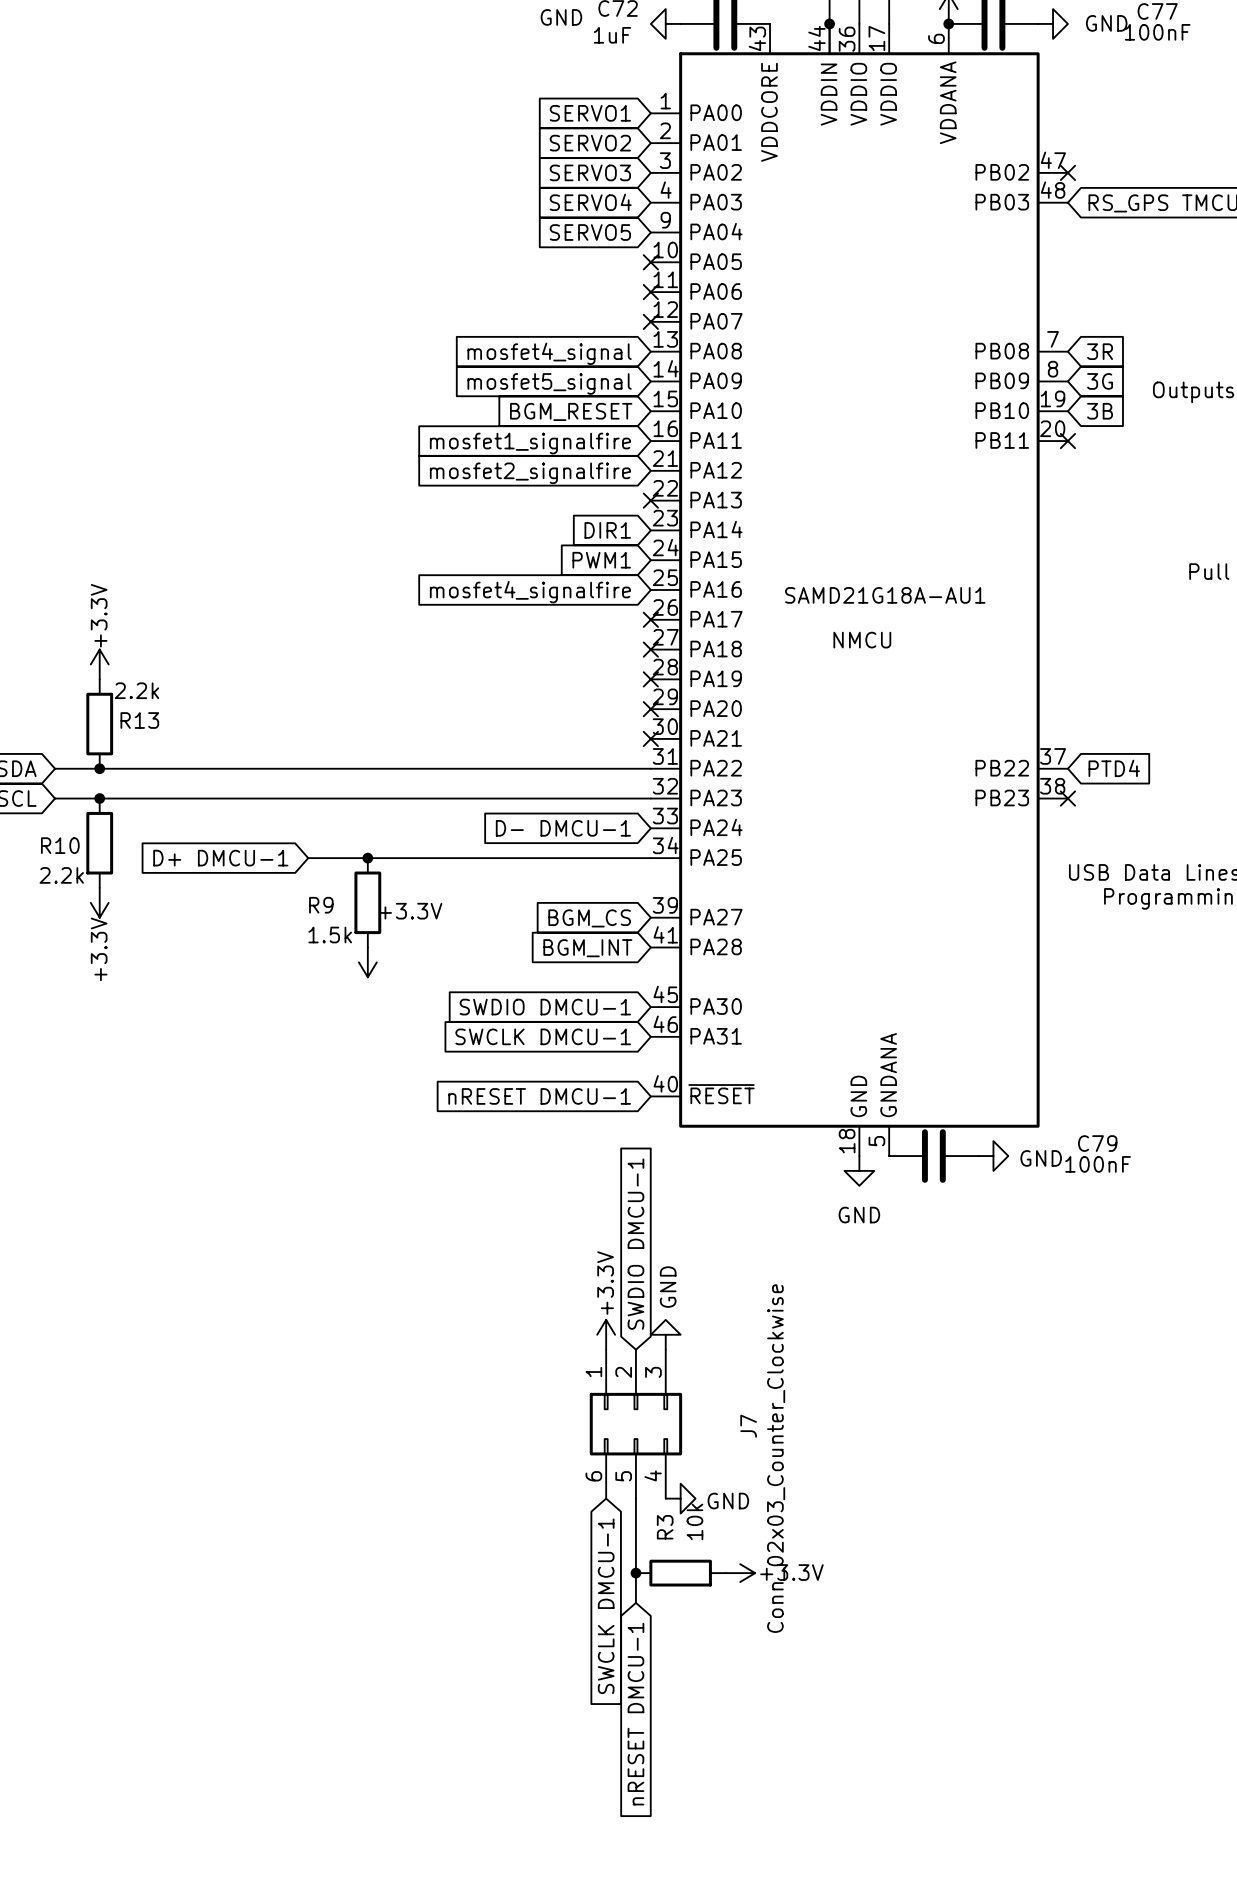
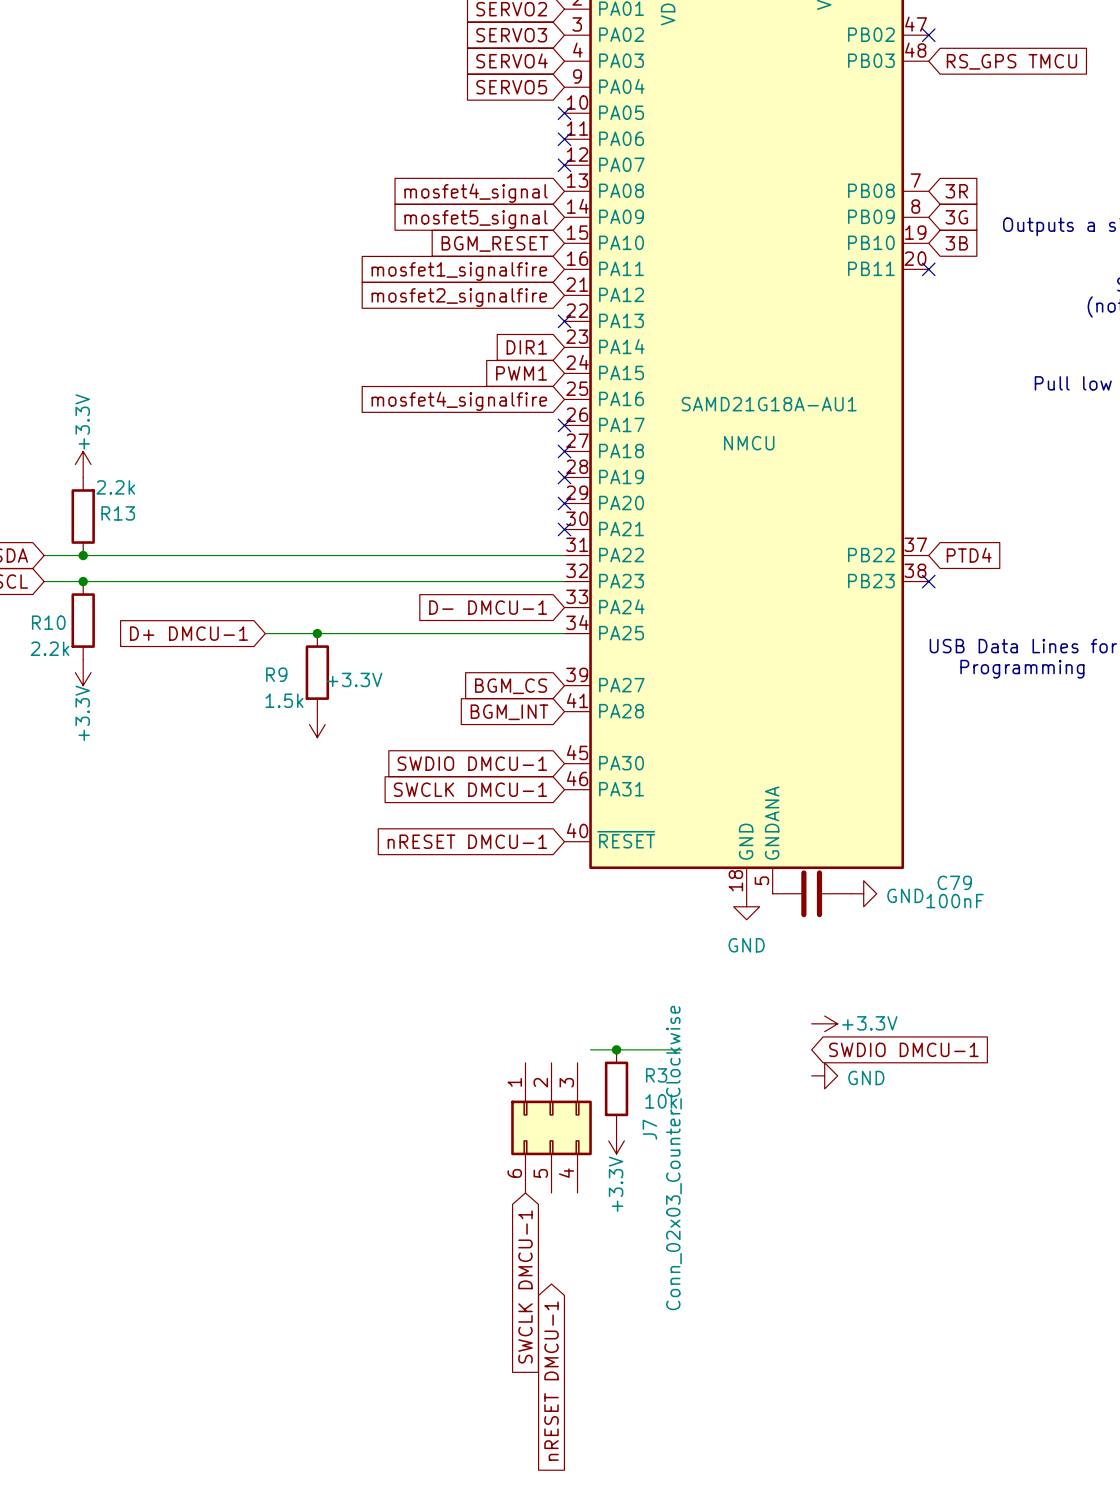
global label: SWDIO DMCU-1 (635, 1244) -> none
power symbol: none -> +3.3V (824, 1023)
power symbol: +3.3V (606, 1334) -> none
power symbol: GND (665, 1334) -> none
wire: none -> (590, 1049) (681, 1049)
junction: none -> (616, 1049)
global label: none -> SWDIO DMCU-1 (903, 1049)
power symbol: none -> GND (824, 1075)
power symbol: none -> +3.3V (616, 1140)
wire: (635, 1498) (635, 1602) -> none
power symbol: GND (680, 1498) -> none
junction: (635, 1573) -> none
R3 rotation: 0° (680, 1573) -> 90° clockwise (616, 1088)
R3 position: (680, 1573) -> (616, 1088)
power symbol: +3.3V (740, 1573) -> none

